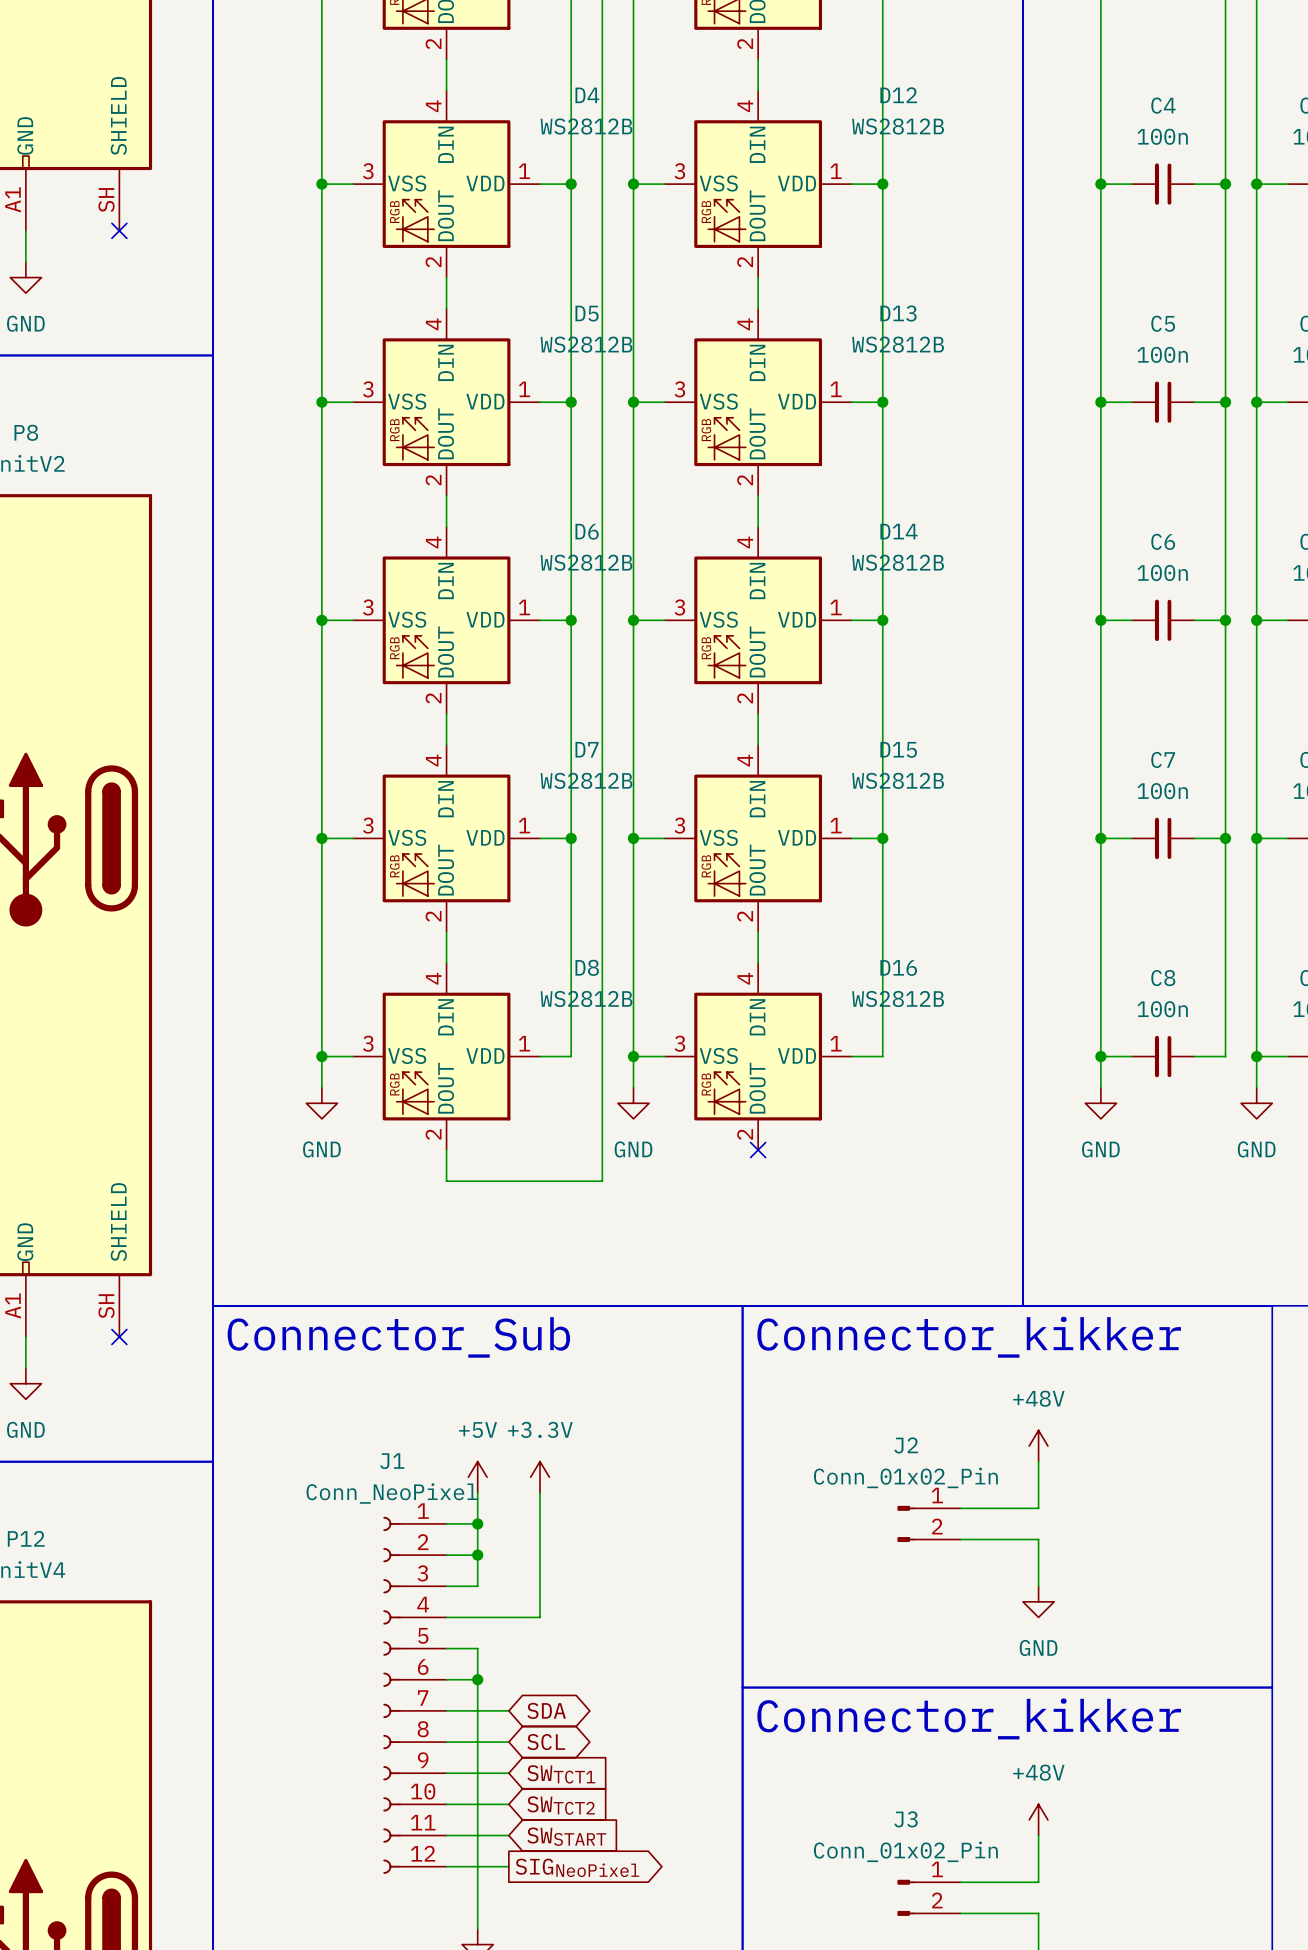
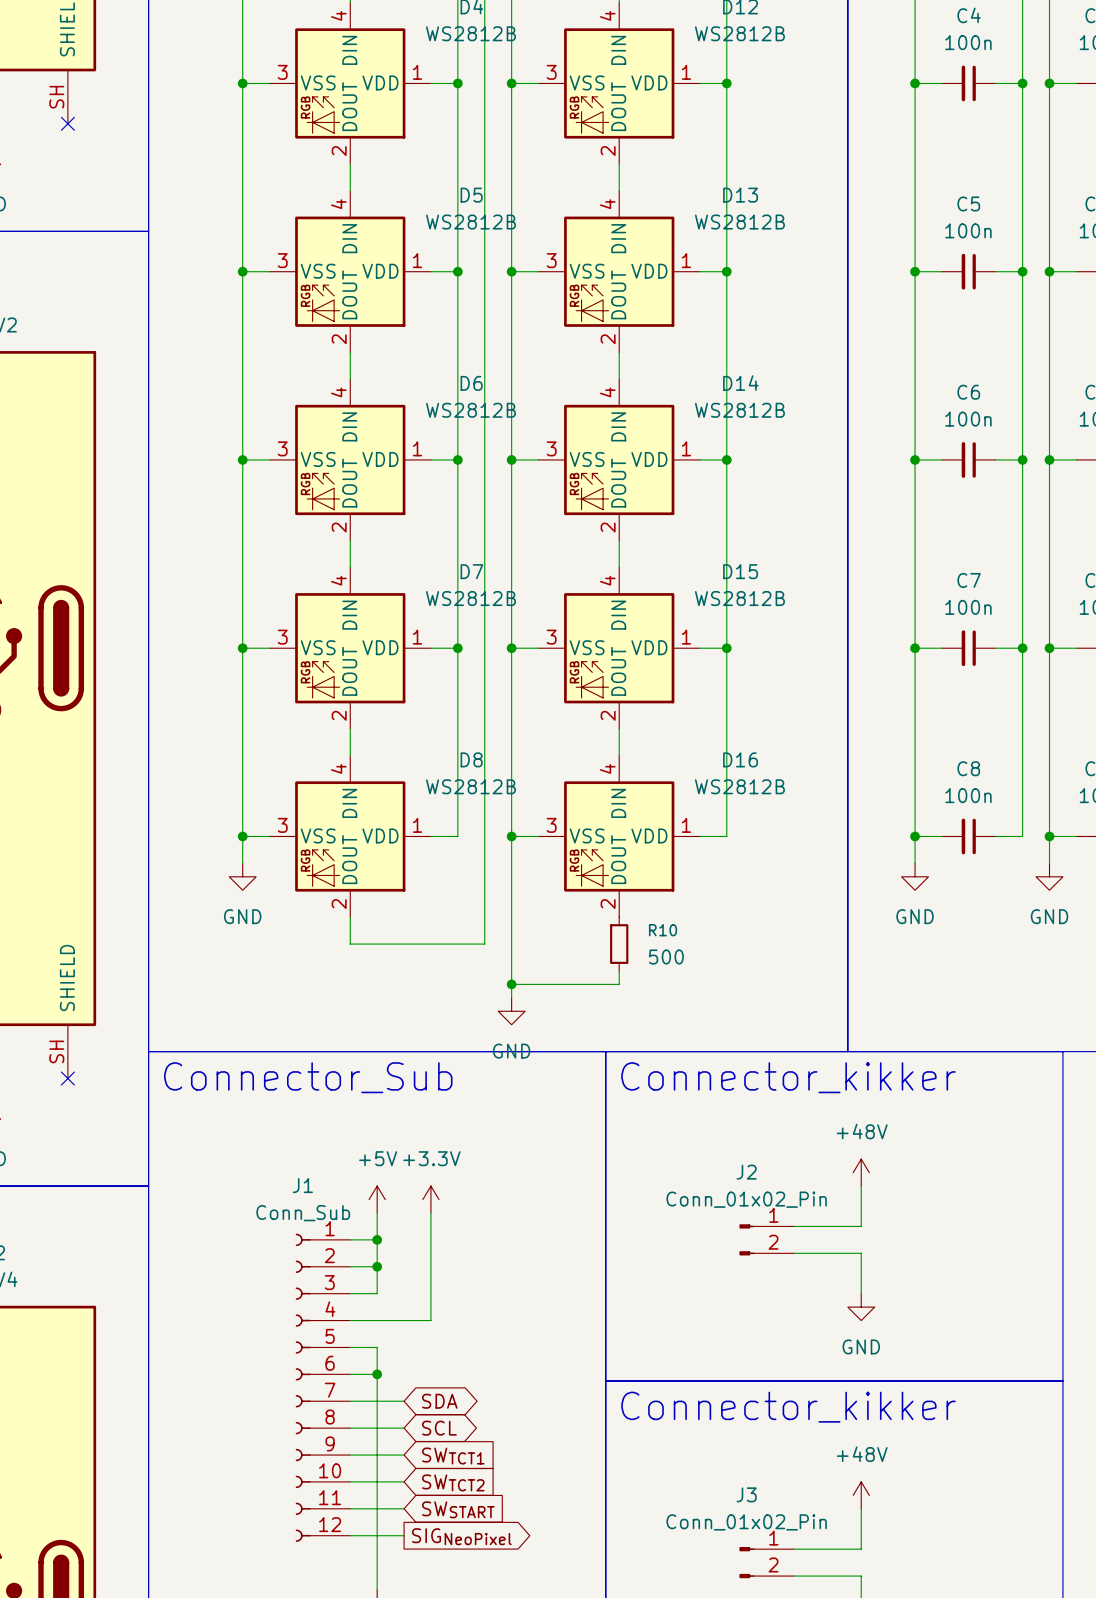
wire: none -> (511, 863) (511, 997)
power symbol position: GND (633, 1103) -> GND (511, 1011)
no-connect mark: (758, 1150) -> none
R10: none -> 500 (619, 944)
wire: none -> (619, 970) (619, 984) (511, 984)
junction: none -> (511, 984)
J1 value: Conn_NeoPixel (391, 1493) -> Conn_Sub (303, 1213)

